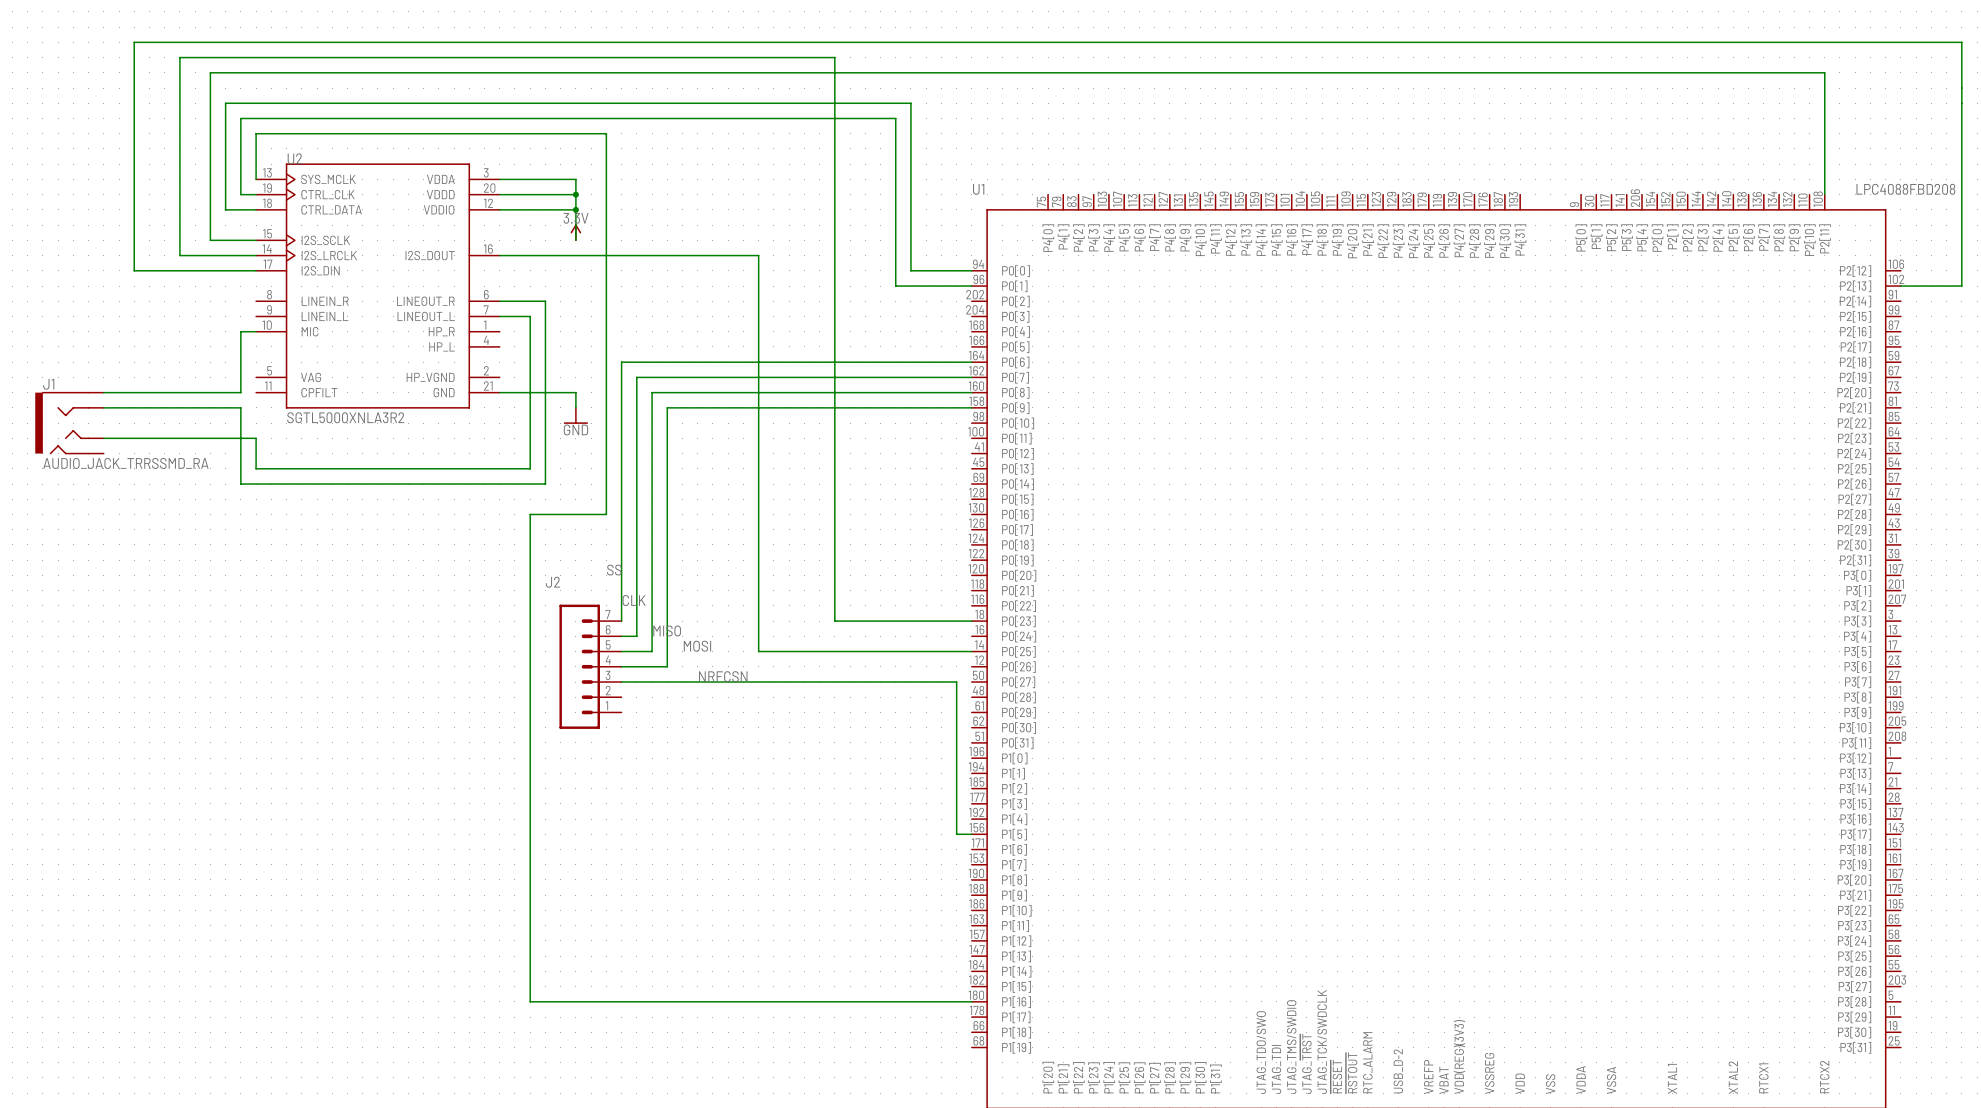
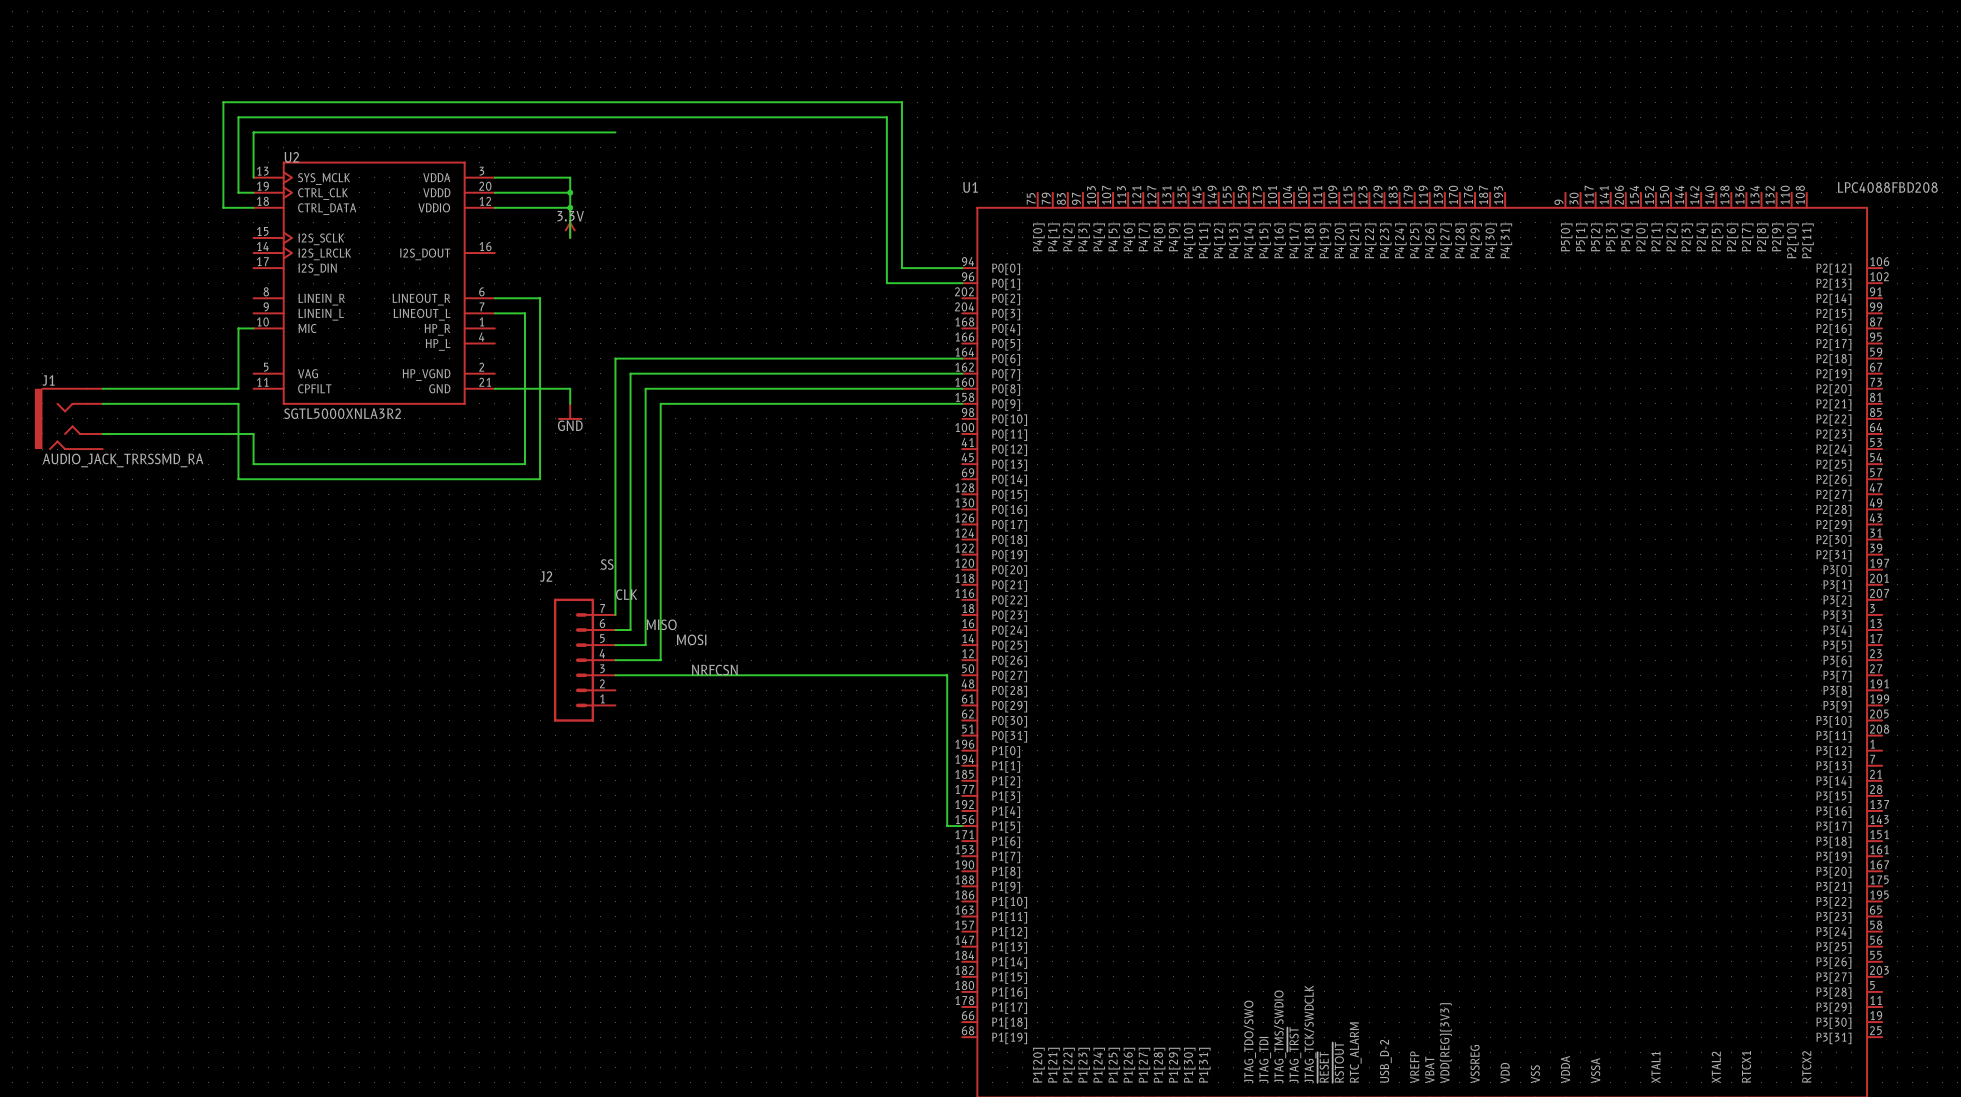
wire: (606, 133) (606, 514) (530, 514) (530, 1001) (971, 1001) -> (600, 132) (615, 132)
wire: (1824, 194) (1824, 72) (210, 72) (210, 240) (256, 240) -> none
wire: (256, 255) (179, 255) (179, 57) (834, 57) (834, 621) (971, 621) -> none
wire: (499, 255) (758, 255) (758, 651) (971, 651) -> none
wire: (256, 270) (134, 270) (134, 42) (1961, 42) (1961, 286) (1900, 286) -> none

